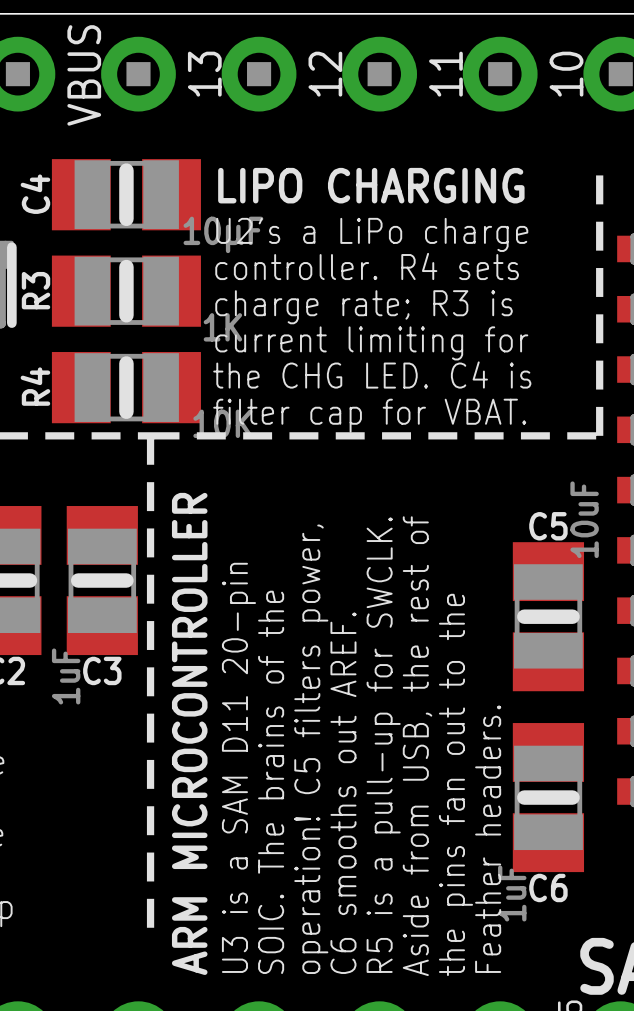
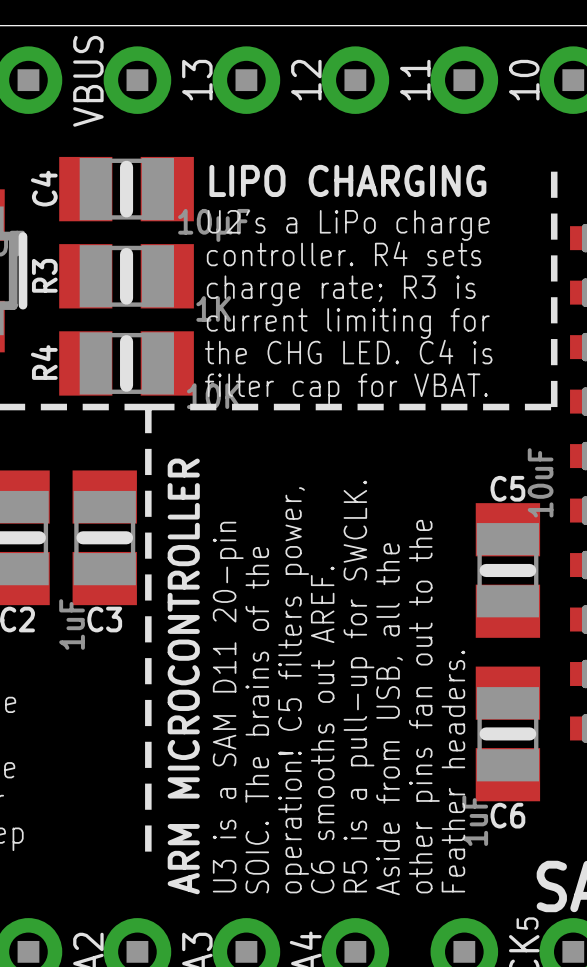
text: Aside from USB, the rest of (417, 746) -> Aside from USB, all the (389, 719)
text: the pins fan out to the (455, 784) -> other pins fan out to the (424, 706)

